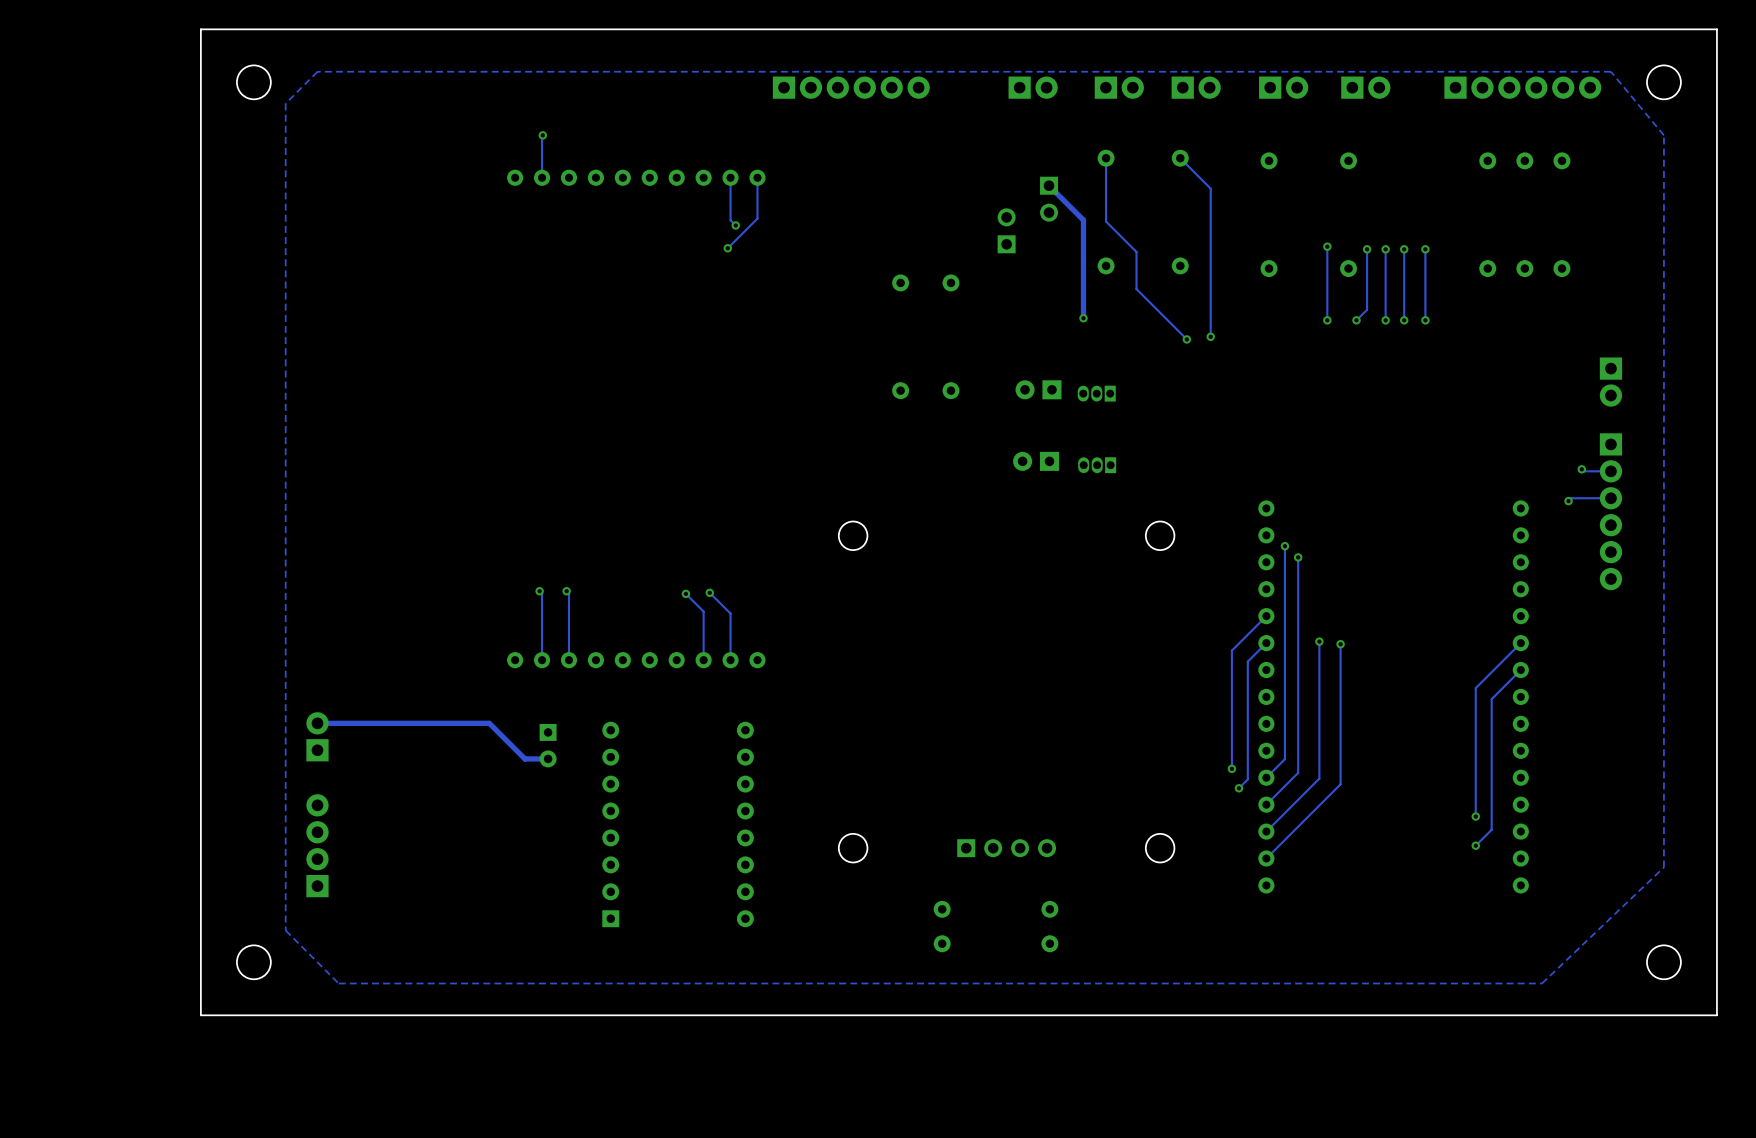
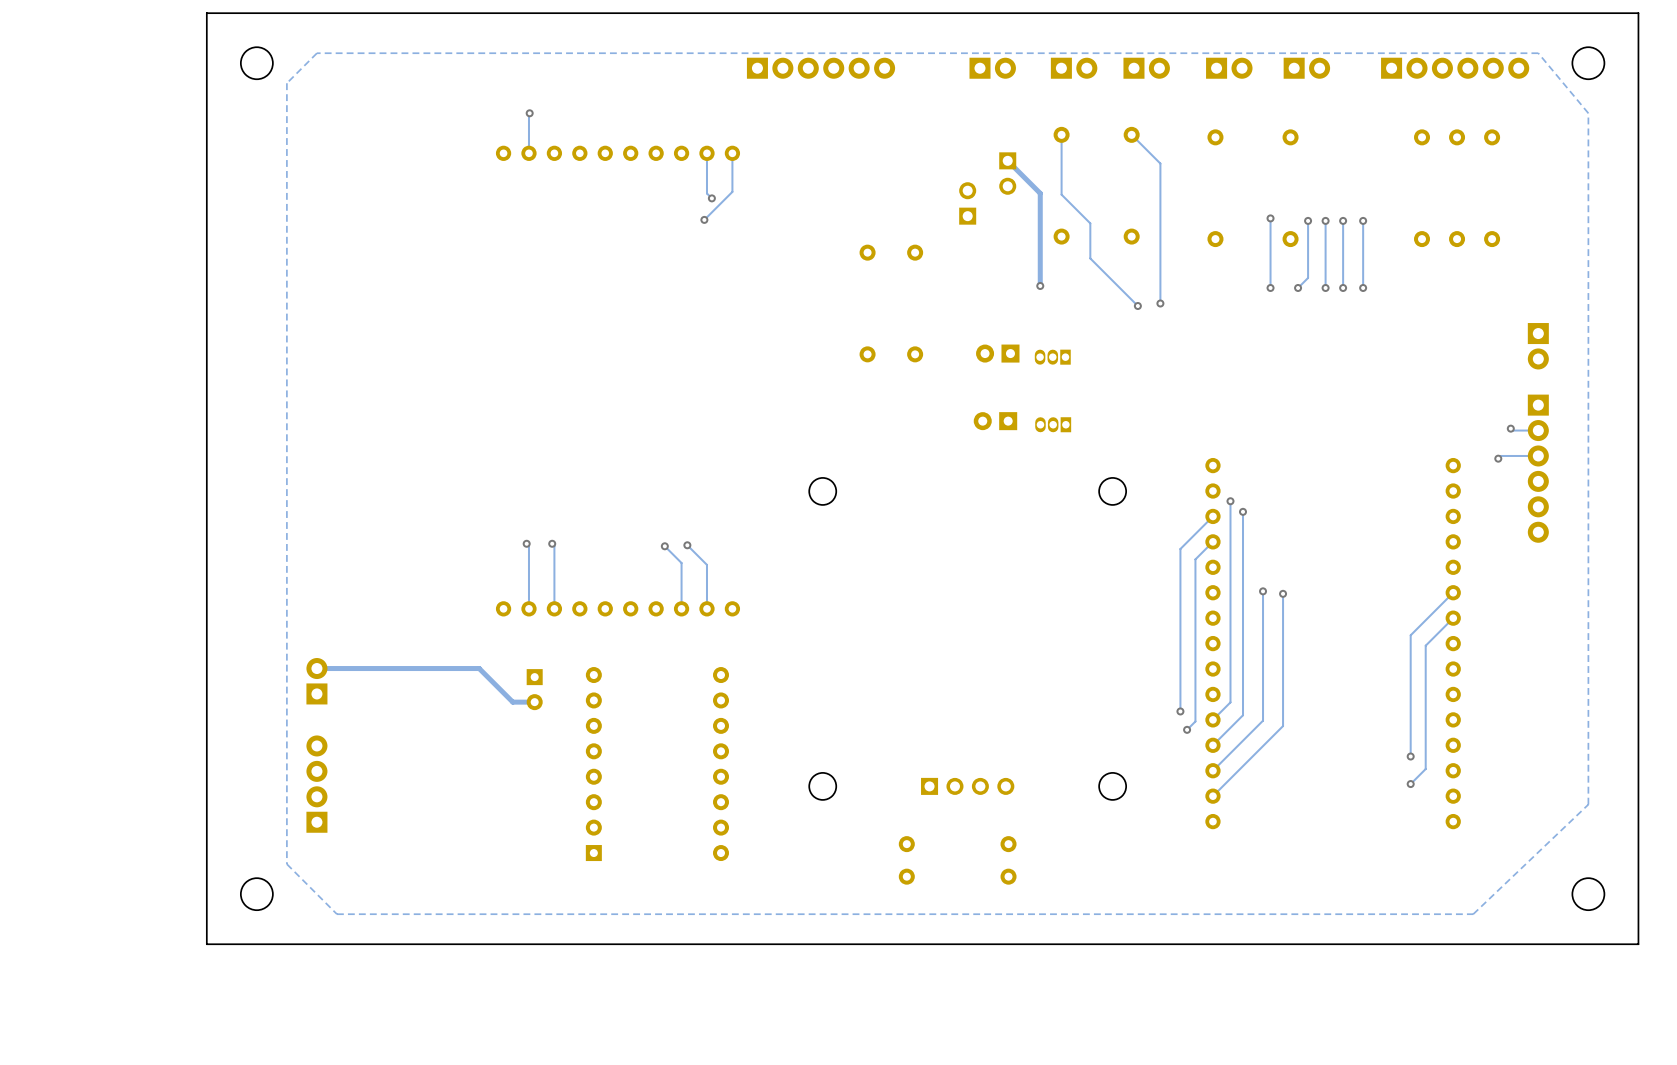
track: (1266, 616) (1231, 650) -> (1212, 516) (1180, 548) (1180, 599)
track: (1266, 643) (1247, 661) -> (1212, 541) (1195, 559) (1195, 610)

